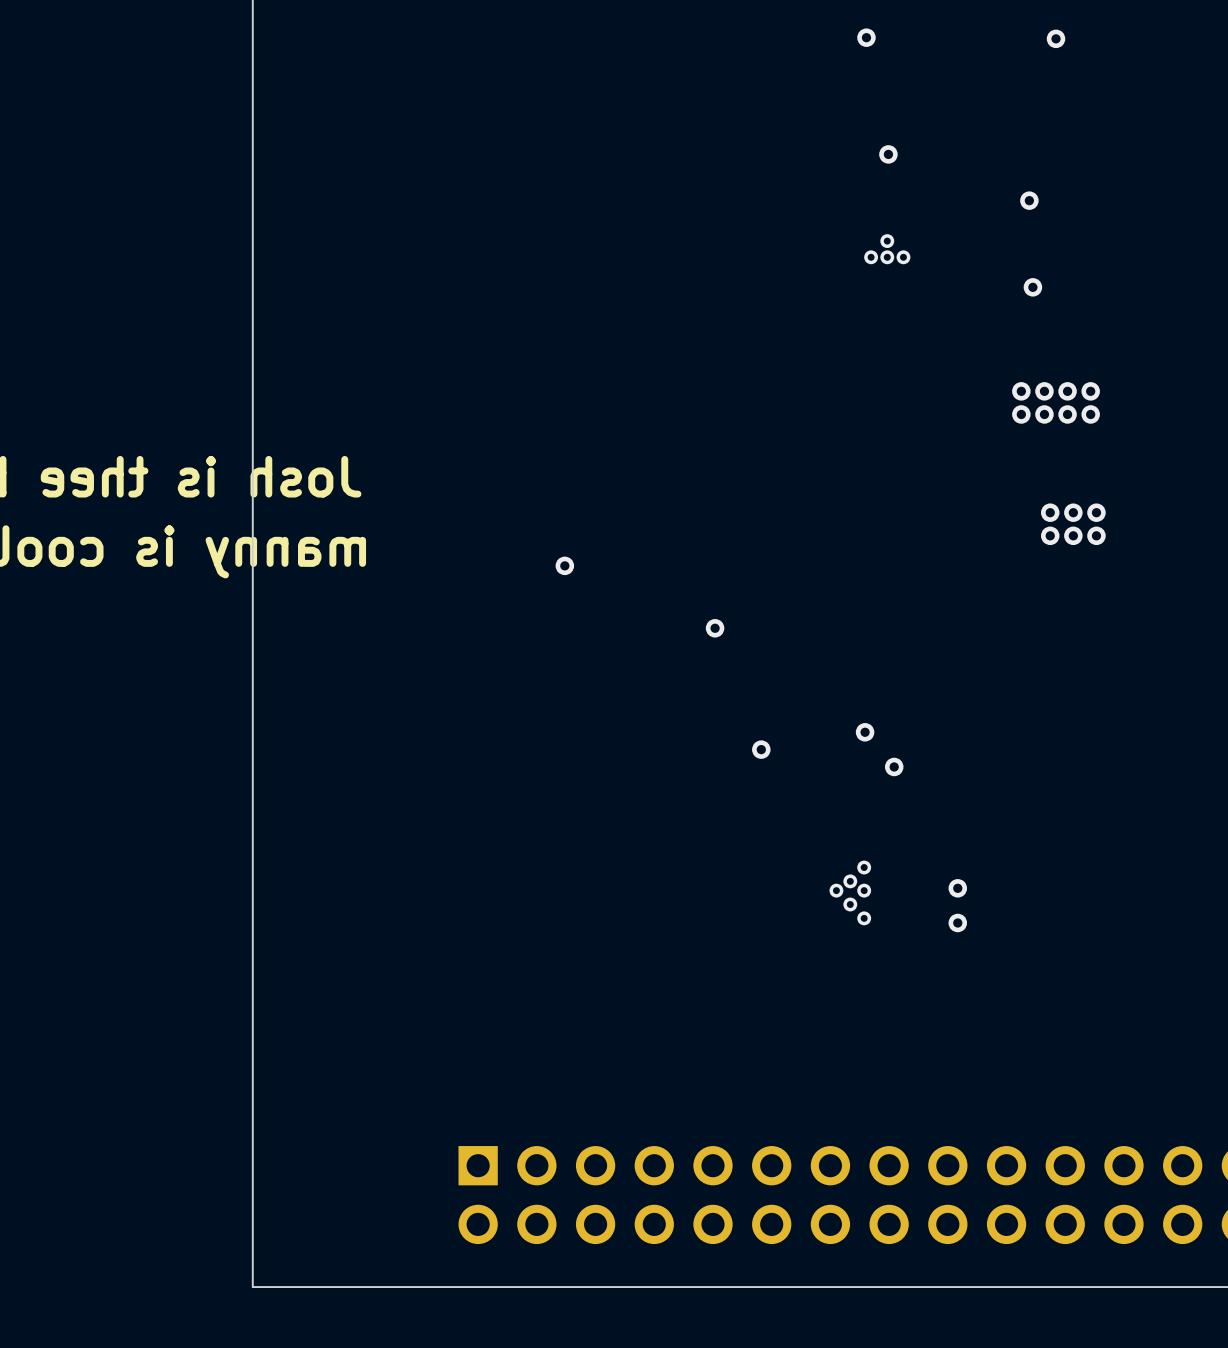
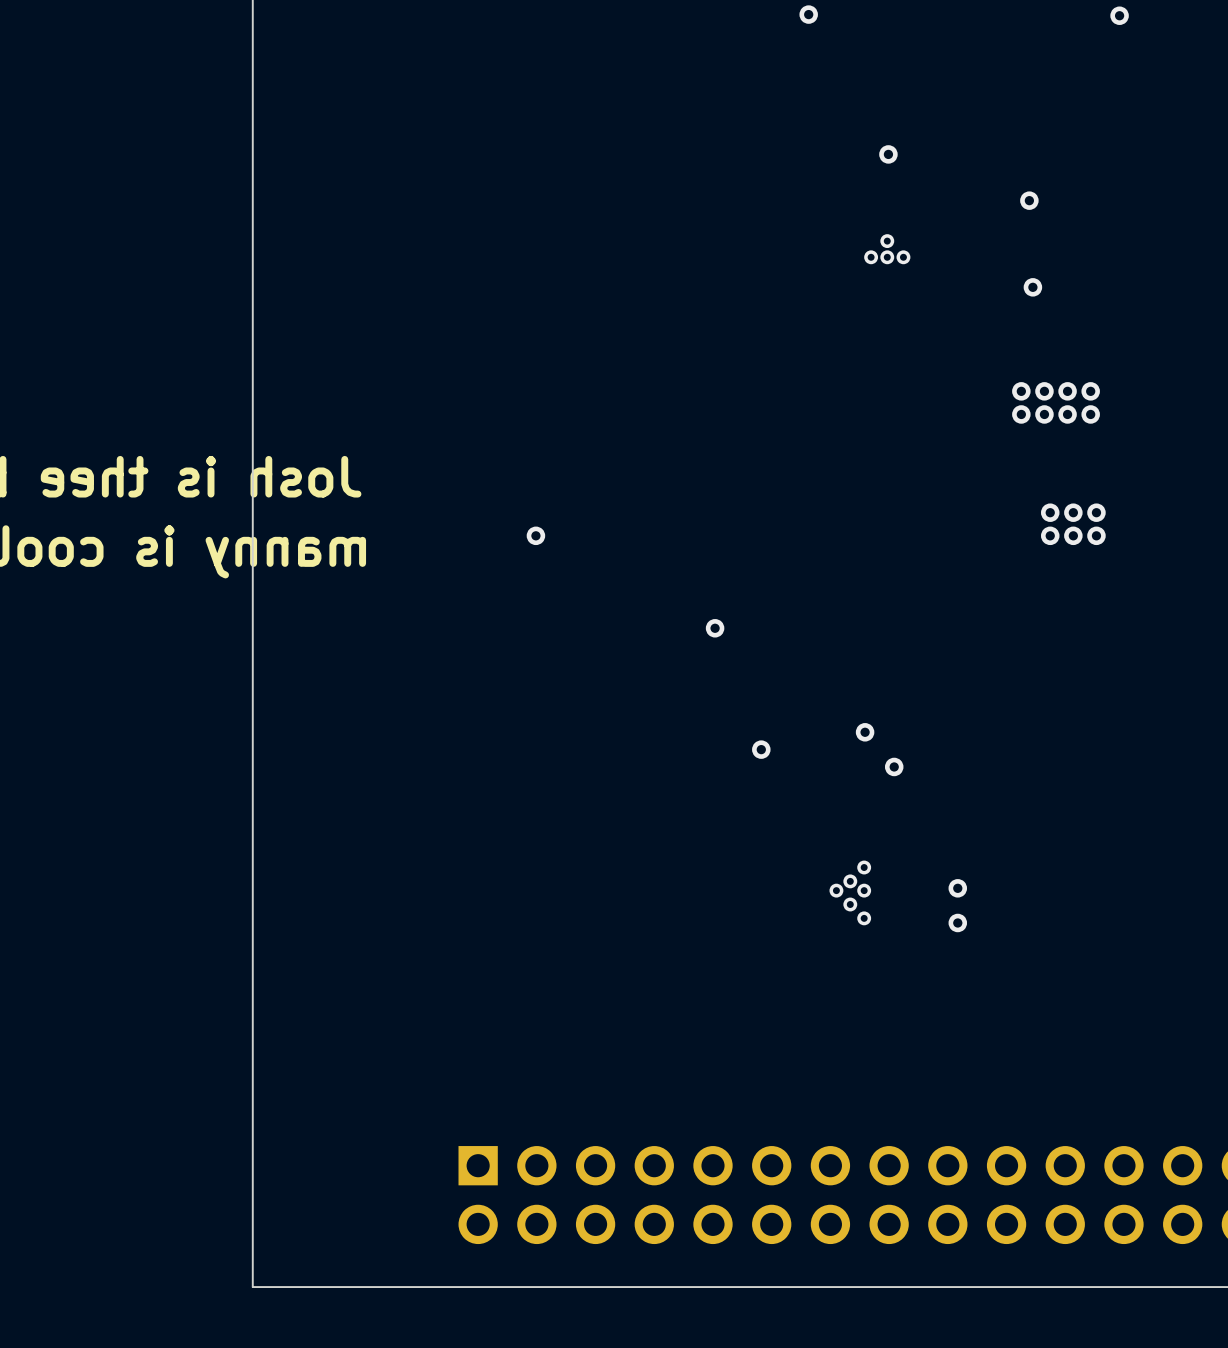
via position: (866, 37) -> (808, 14)
via position: (1056, 38) -> (1119, 15)
via position: (564, 565) -> (535, 535)

